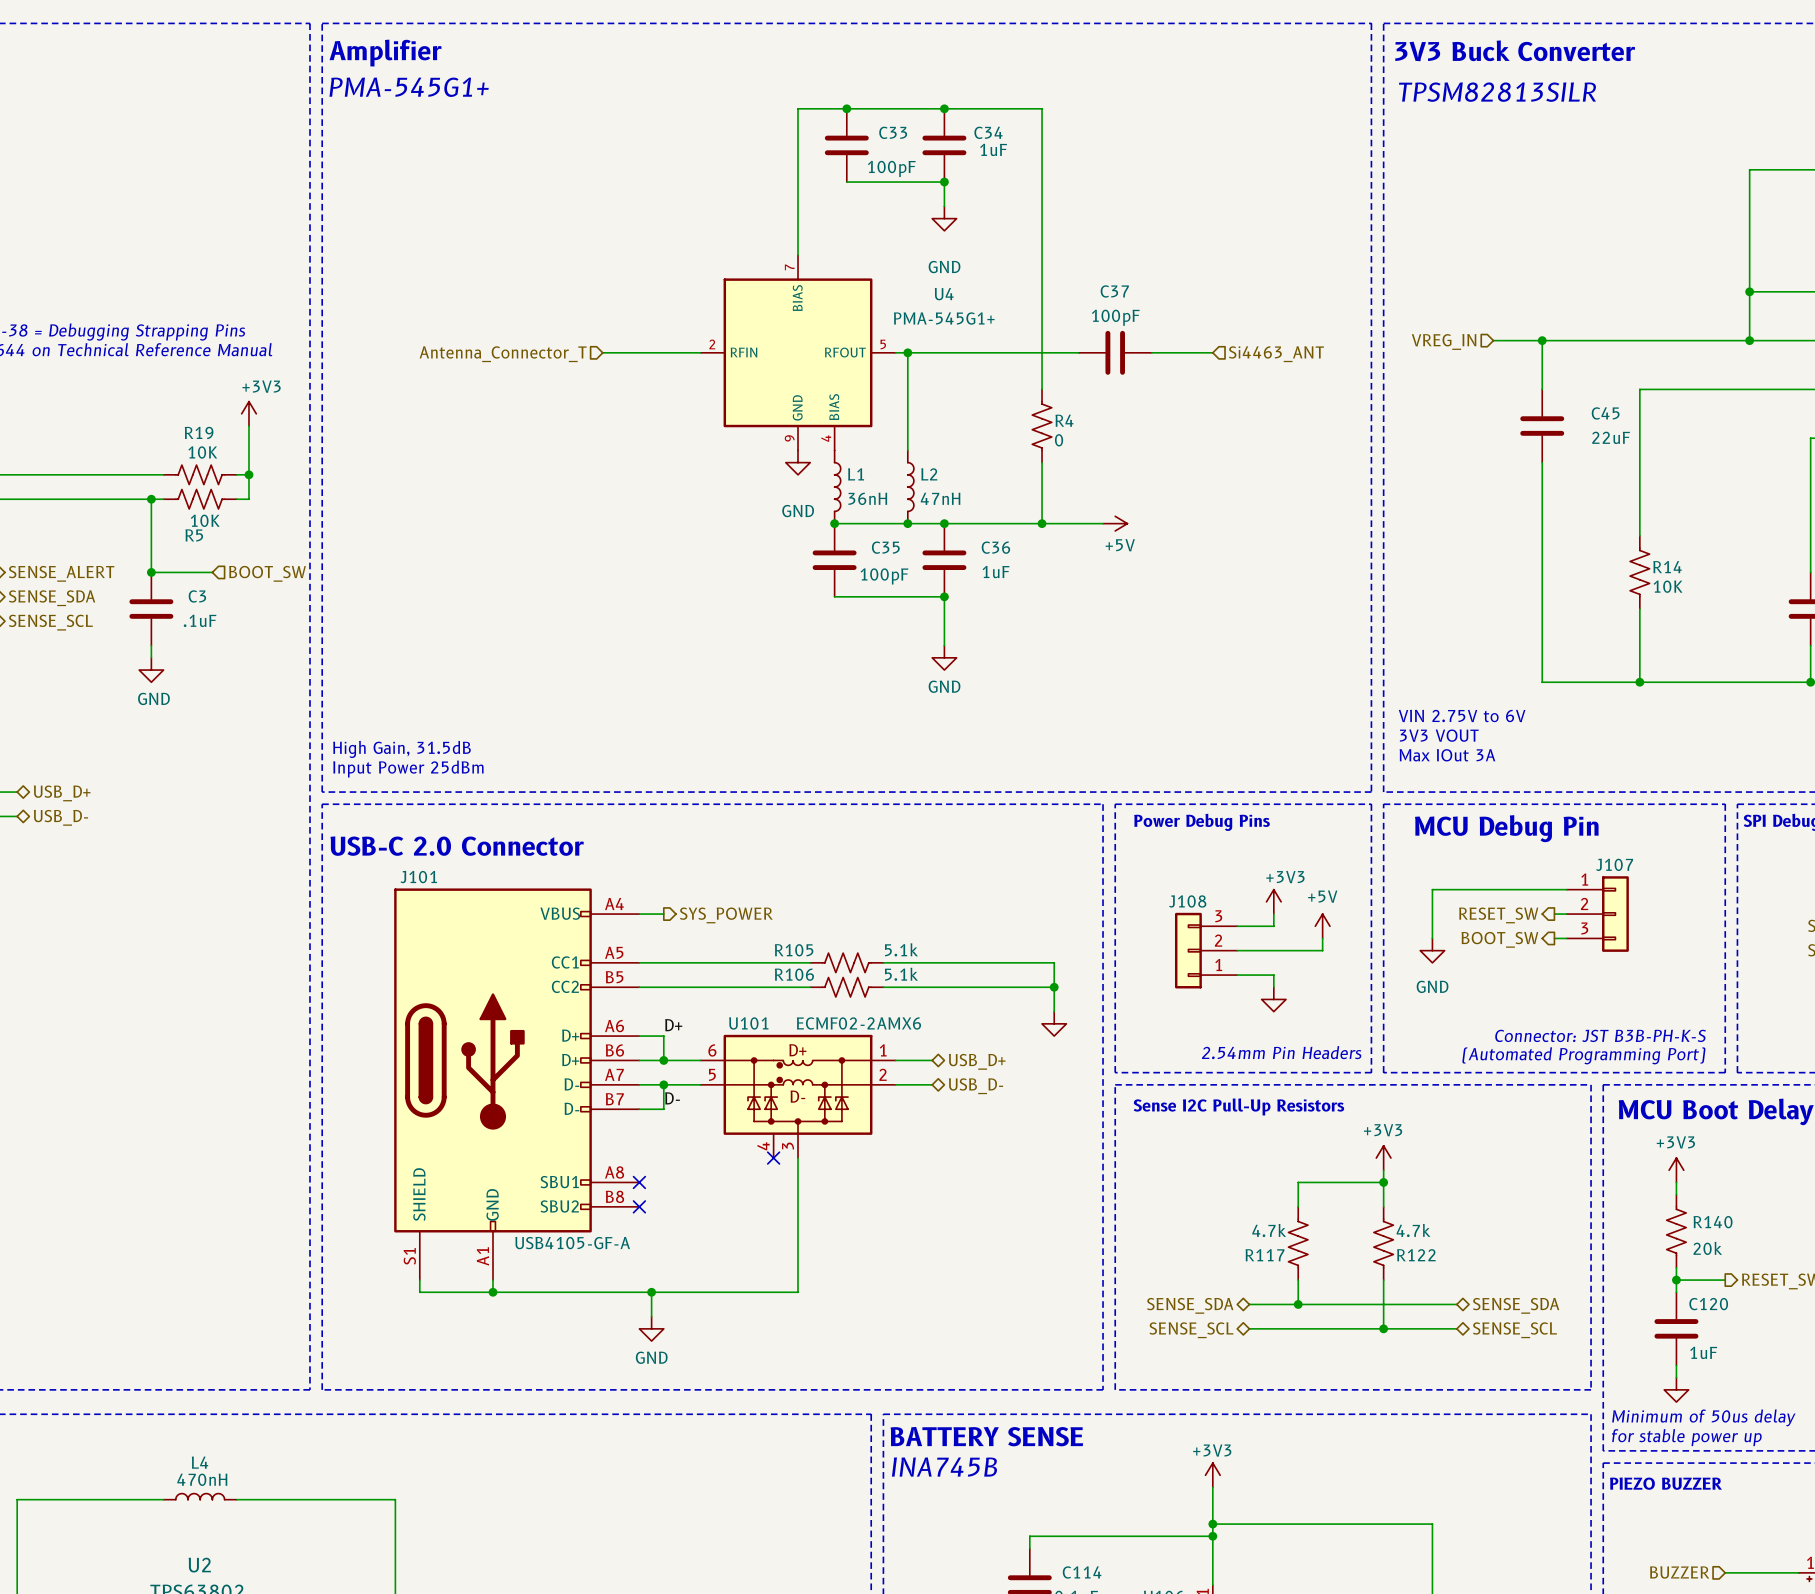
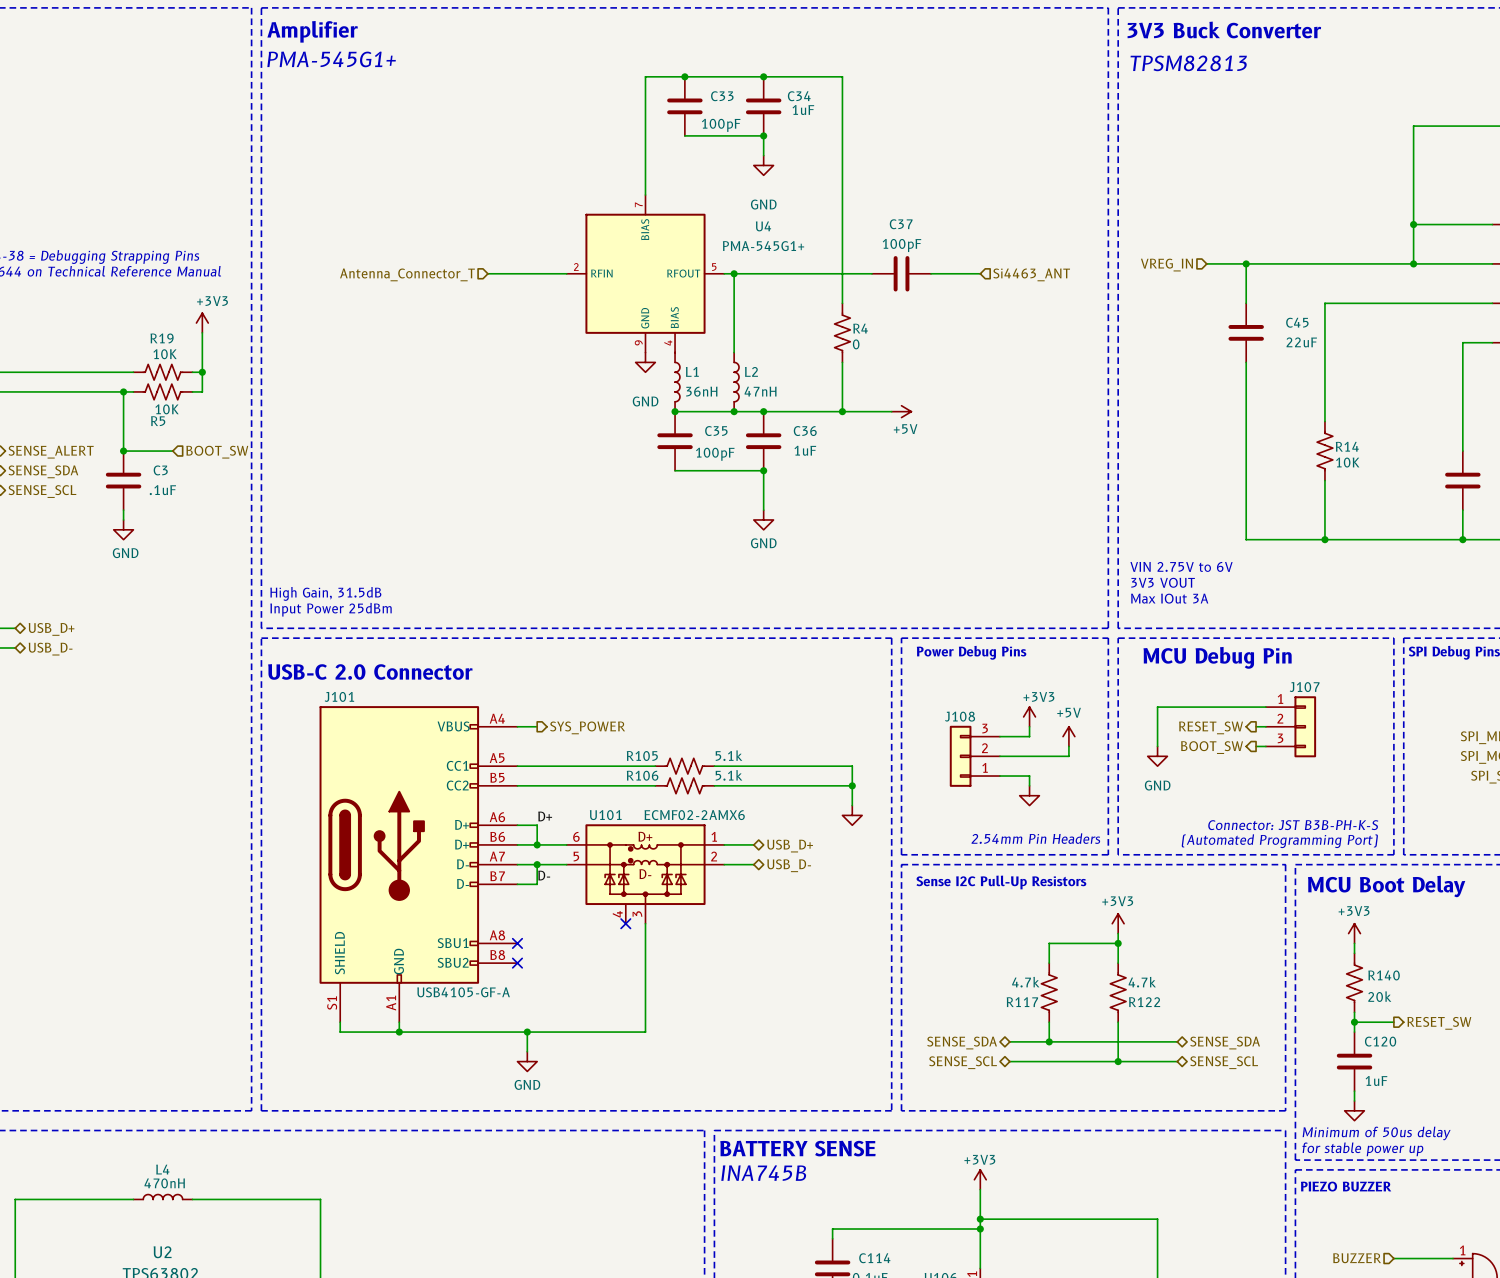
text: TPSM82813SILR (1497, 92) -> TPSM82813 (1188, 63)

